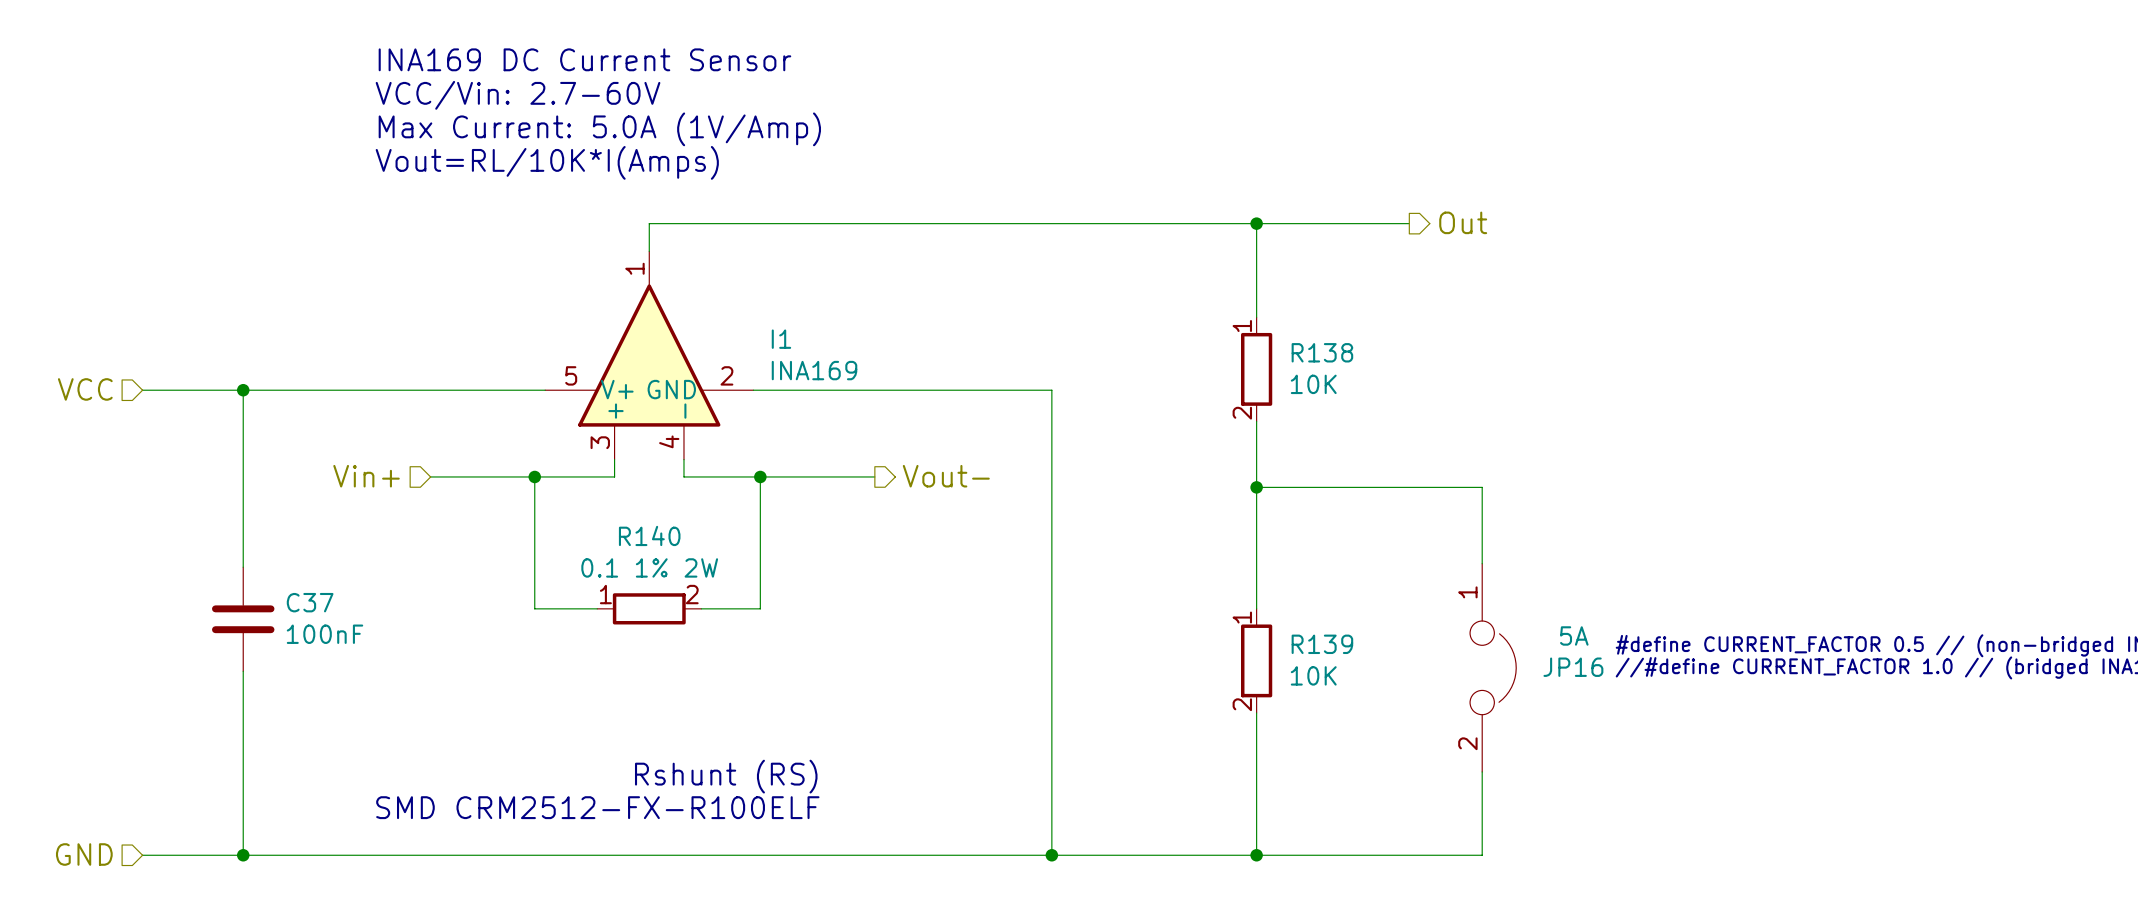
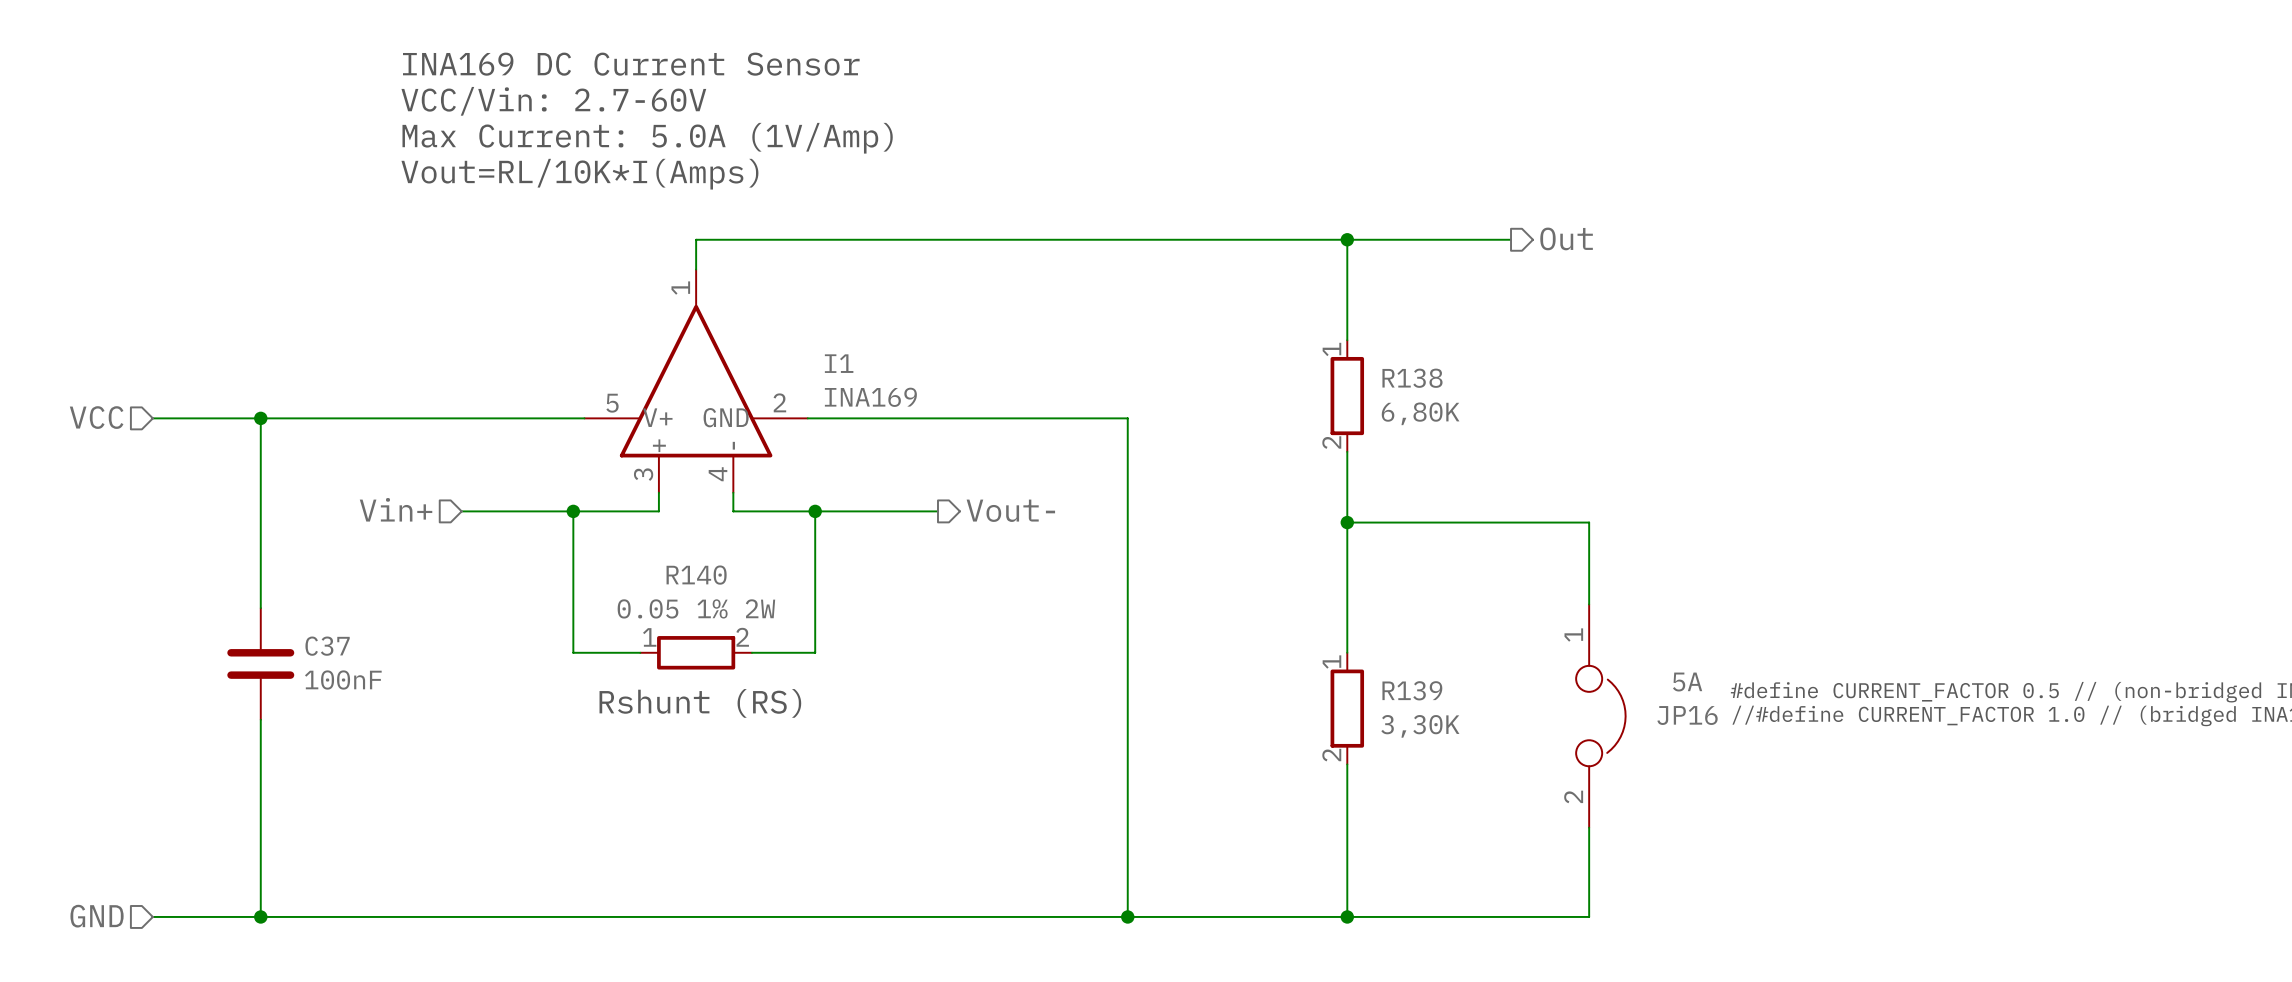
R138 value: 10K (1313, 384) -> 6,80K (1420, 413)
R140 value: 0.1 1% 2W (649, 567) -> 0.05 1% 2W (696, 608)
R139 value: 10K (1313, 675) -> 3,30K (1420, 726)
text position: Rshunt (RS) (726, 776) -> Rshunt (RS) (700, 703)
text: SMD CRM2512-FX-R100ELF (597, 807) -> none

